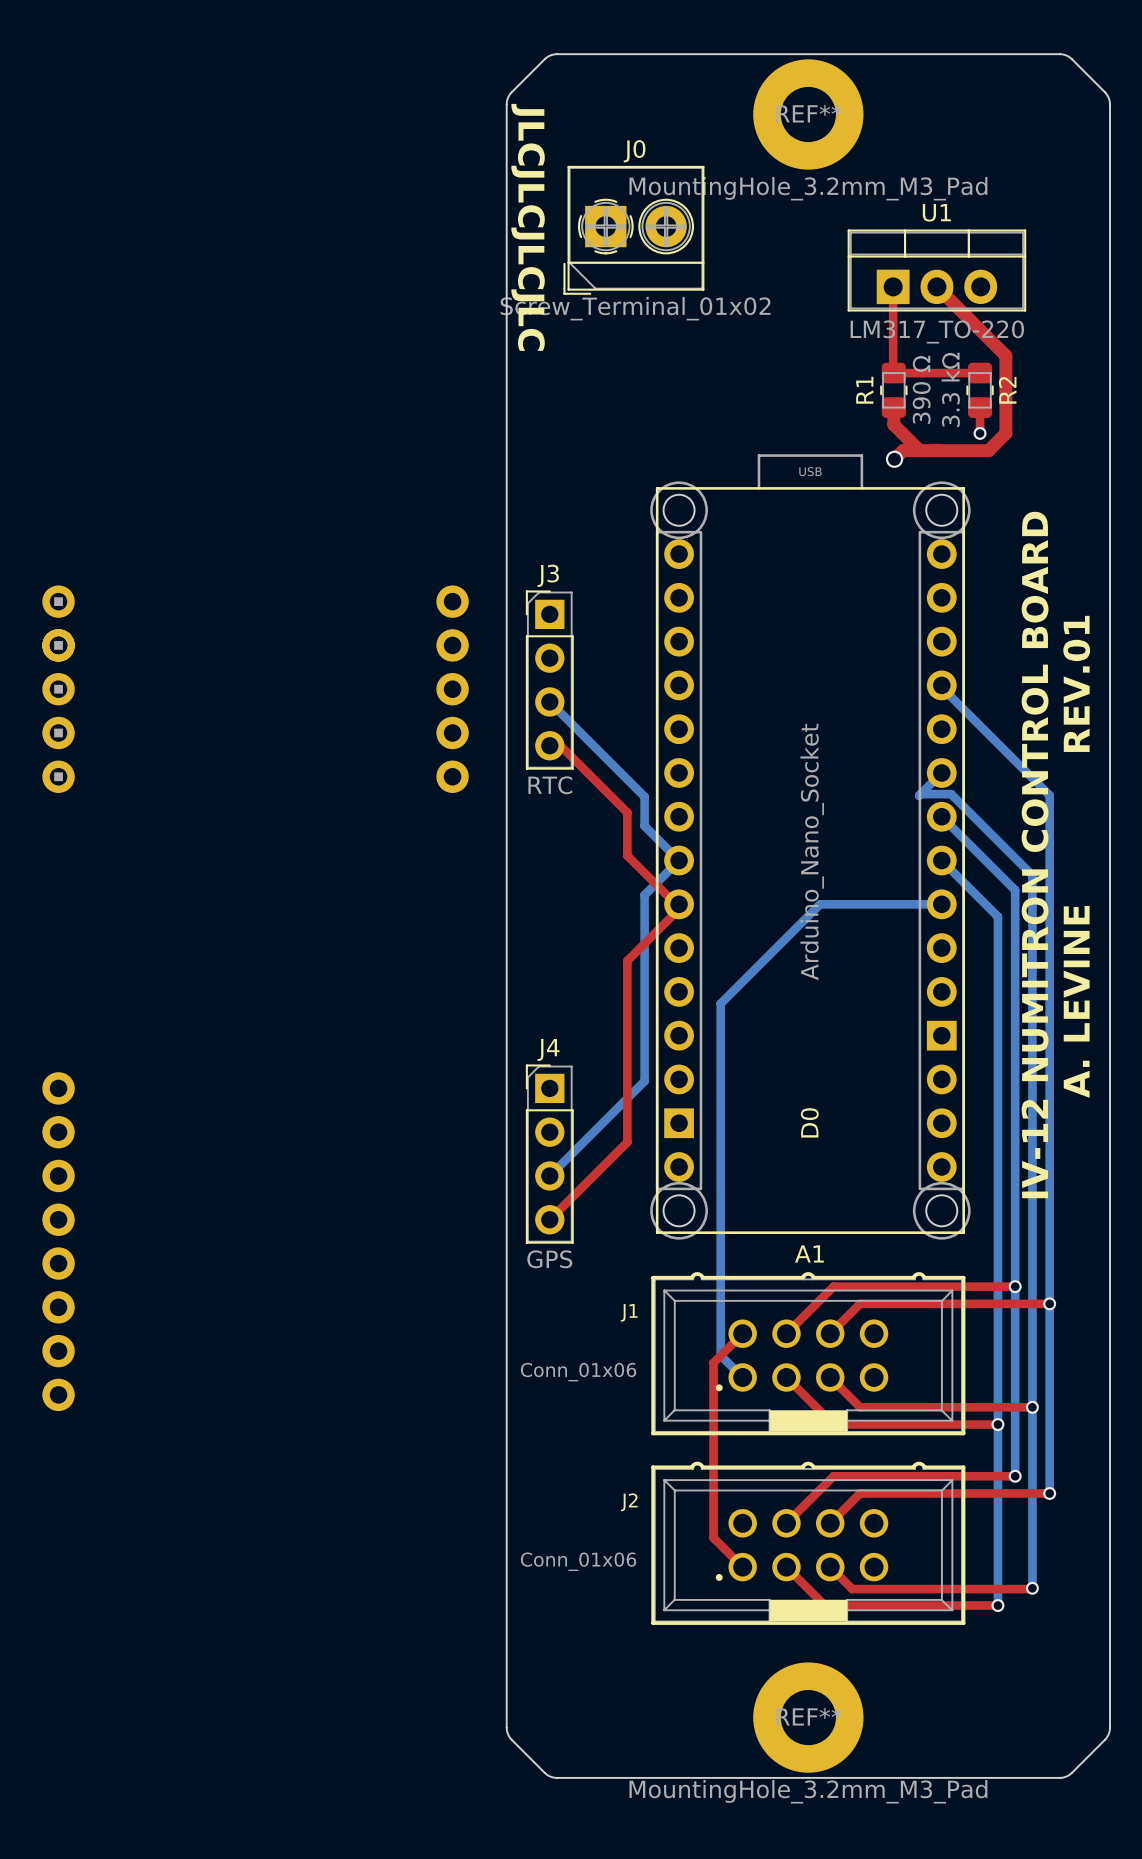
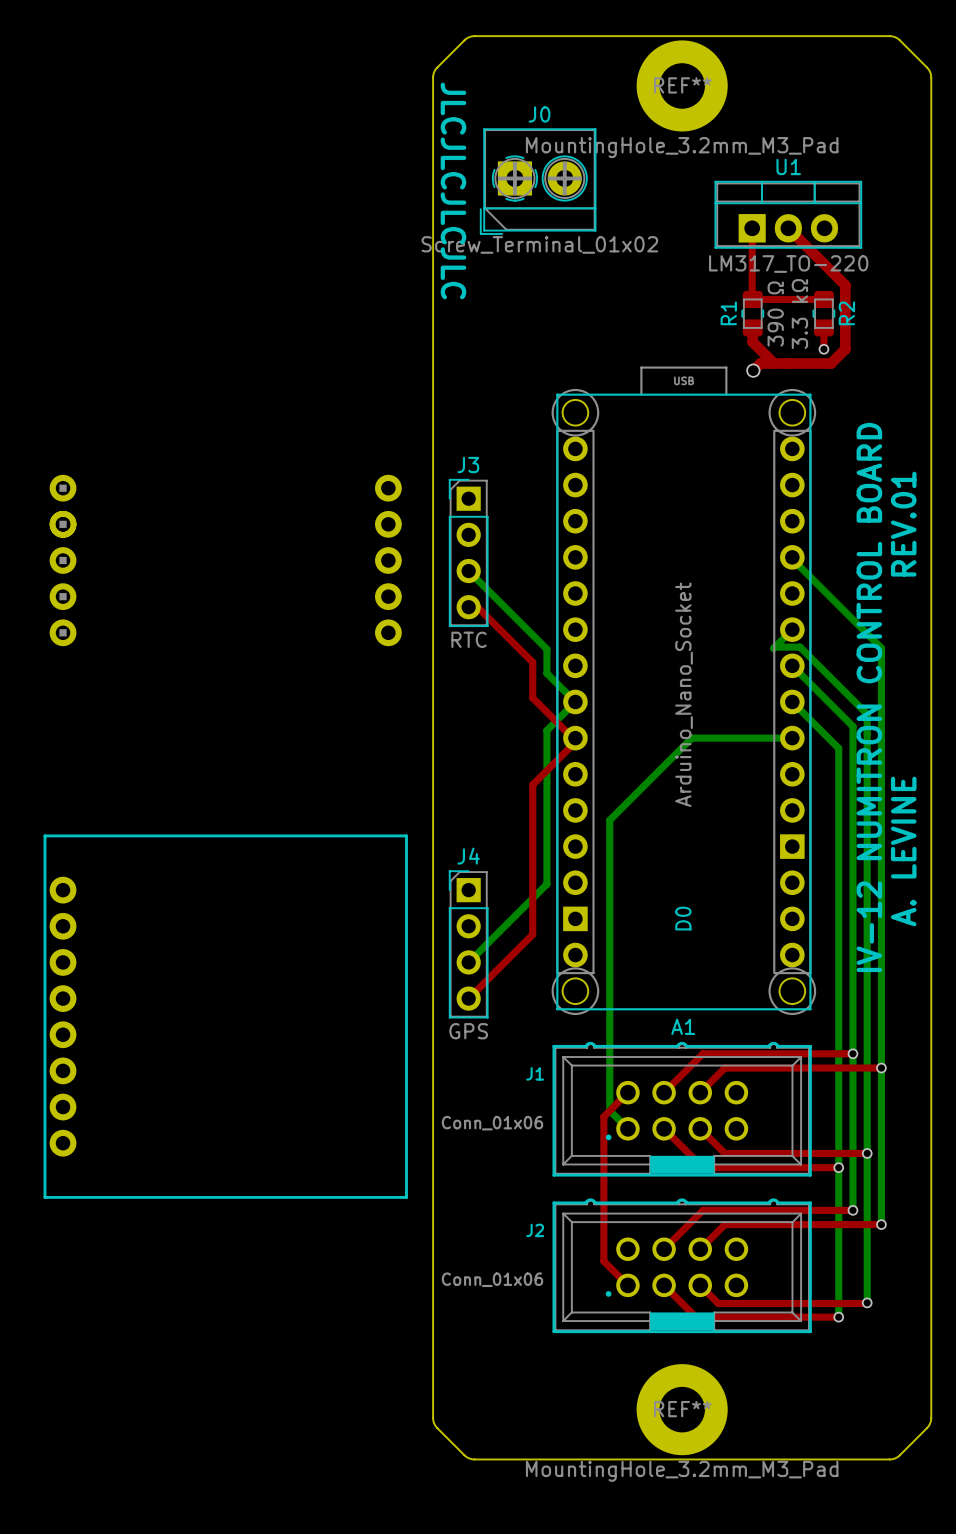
line: none -> (44, 835) (44, 1197) (406, 1197) (406, 835) (44, 835)

